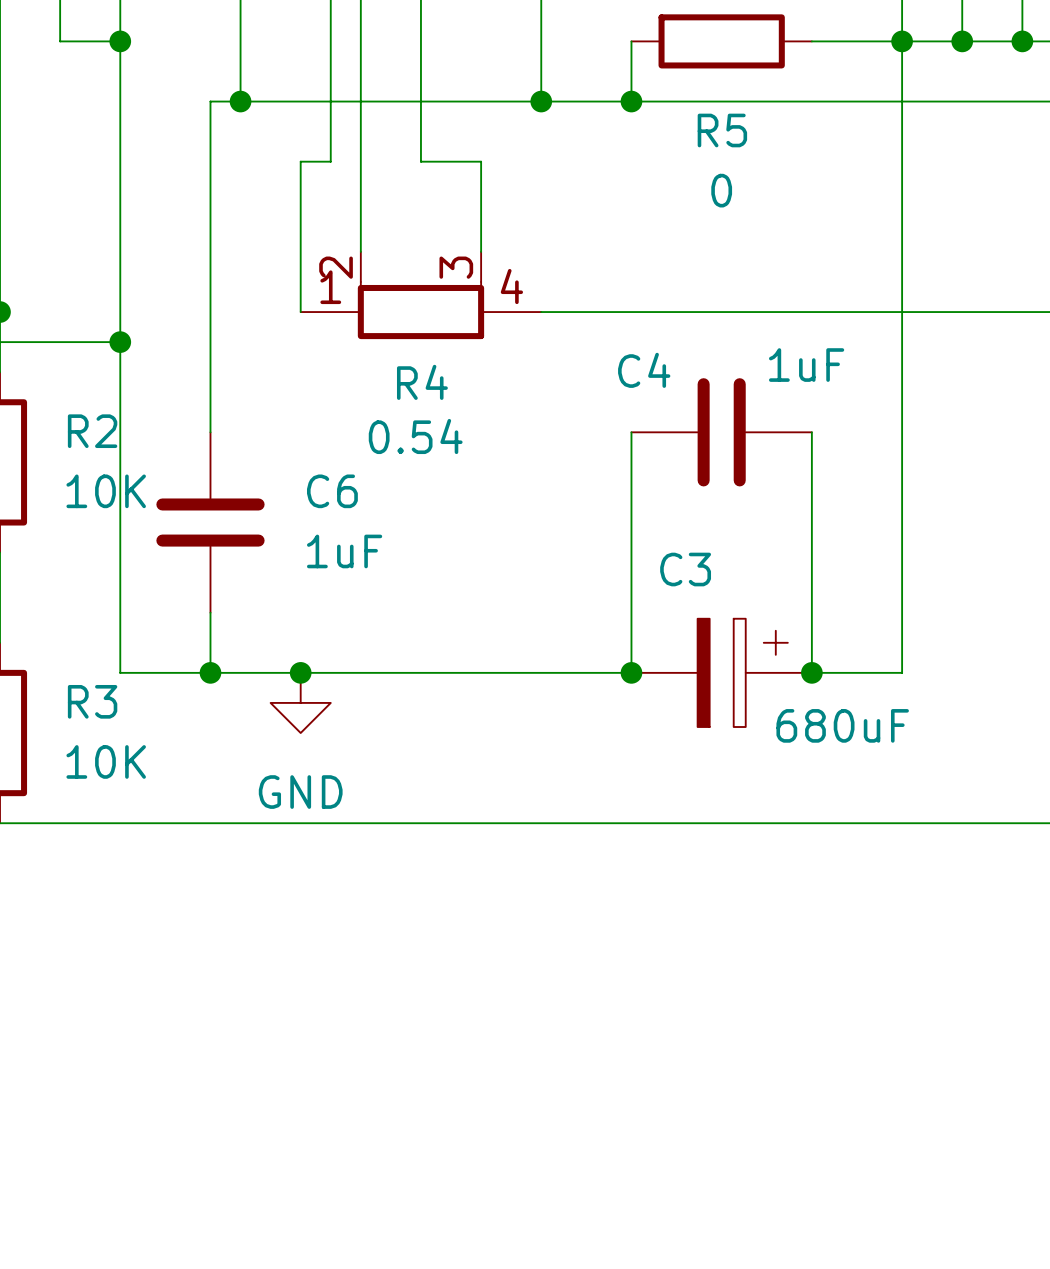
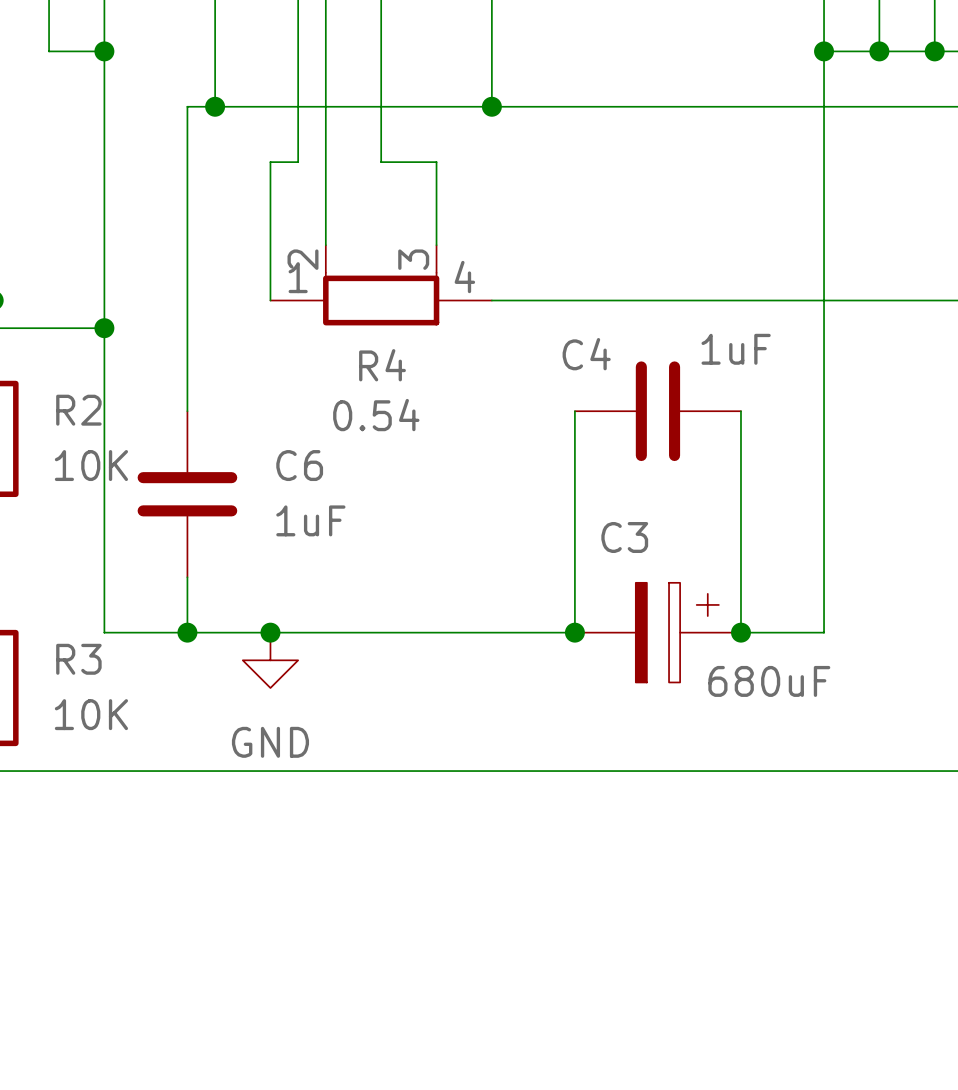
wire: (631, 41) (631, 101) -> none
R5: 0 (721, 41) -> none
wire: (811, 41) (902, 41) -> none
junction: (631, 101) -> none

